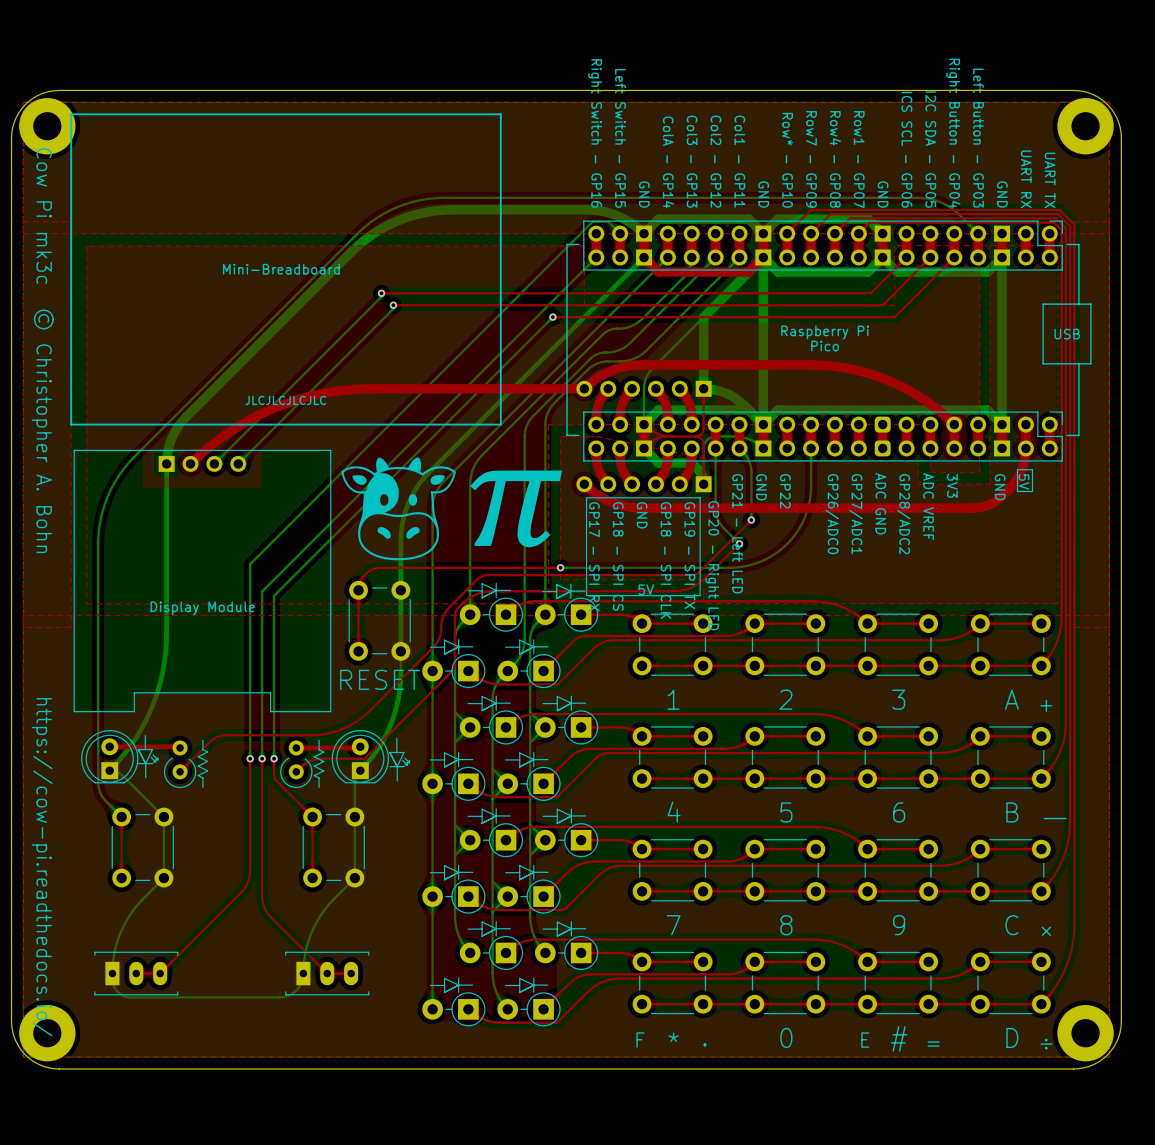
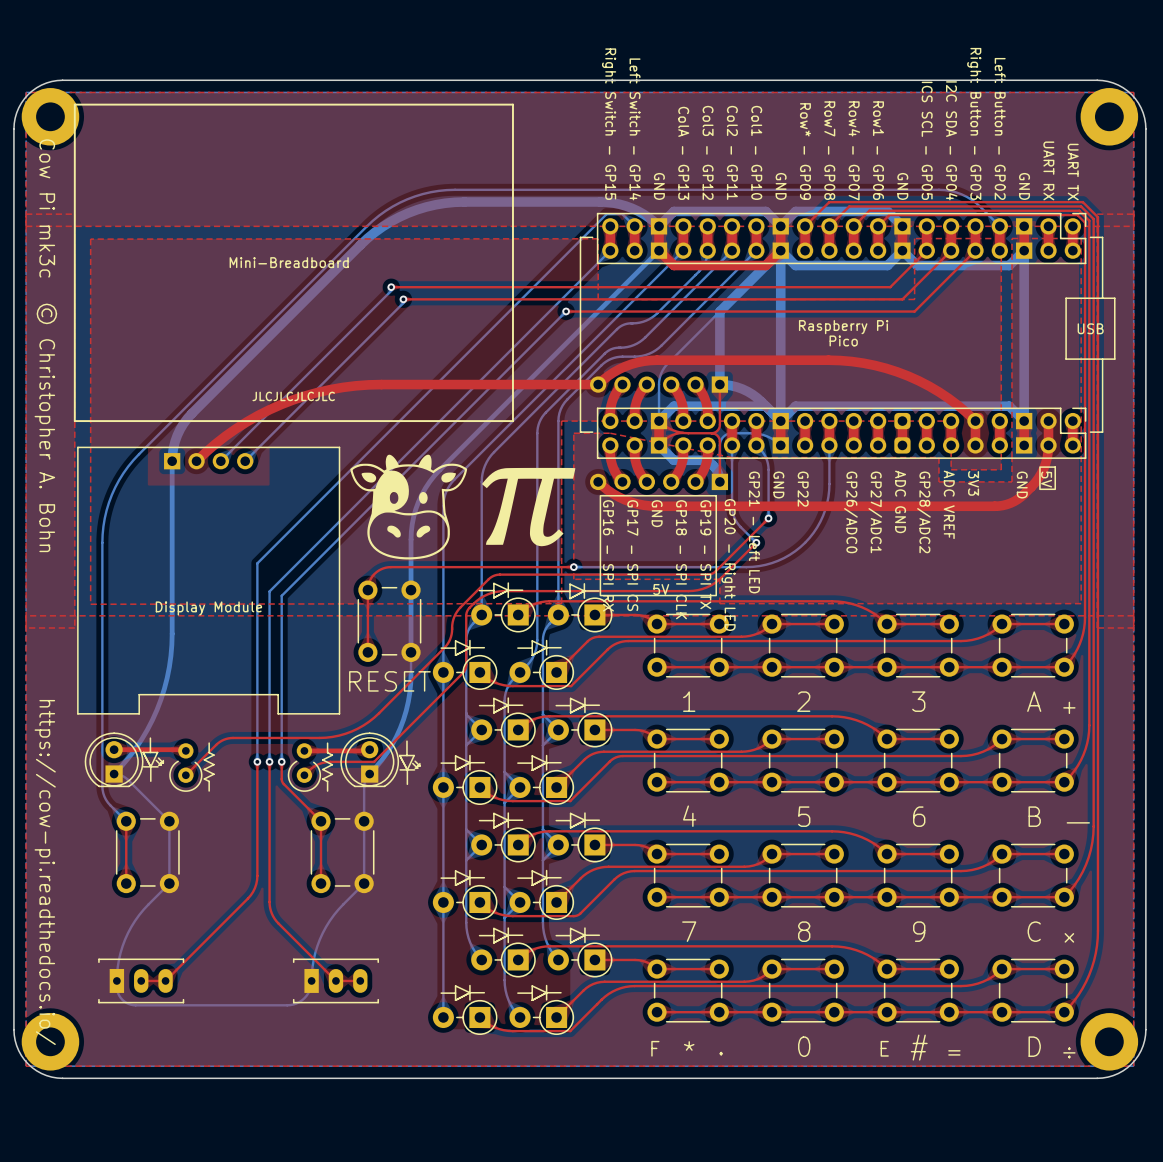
part footprint: [583, 220, 1063, 271] -> [597, 213, 1087, 264]
part text: GP17 - SPI RX (594, 556) -> GP16 - SPI RX (608, 555)
part text: GP18 - SPI CS (618, 556) -> GP17 - SPI CS (632, 555)

